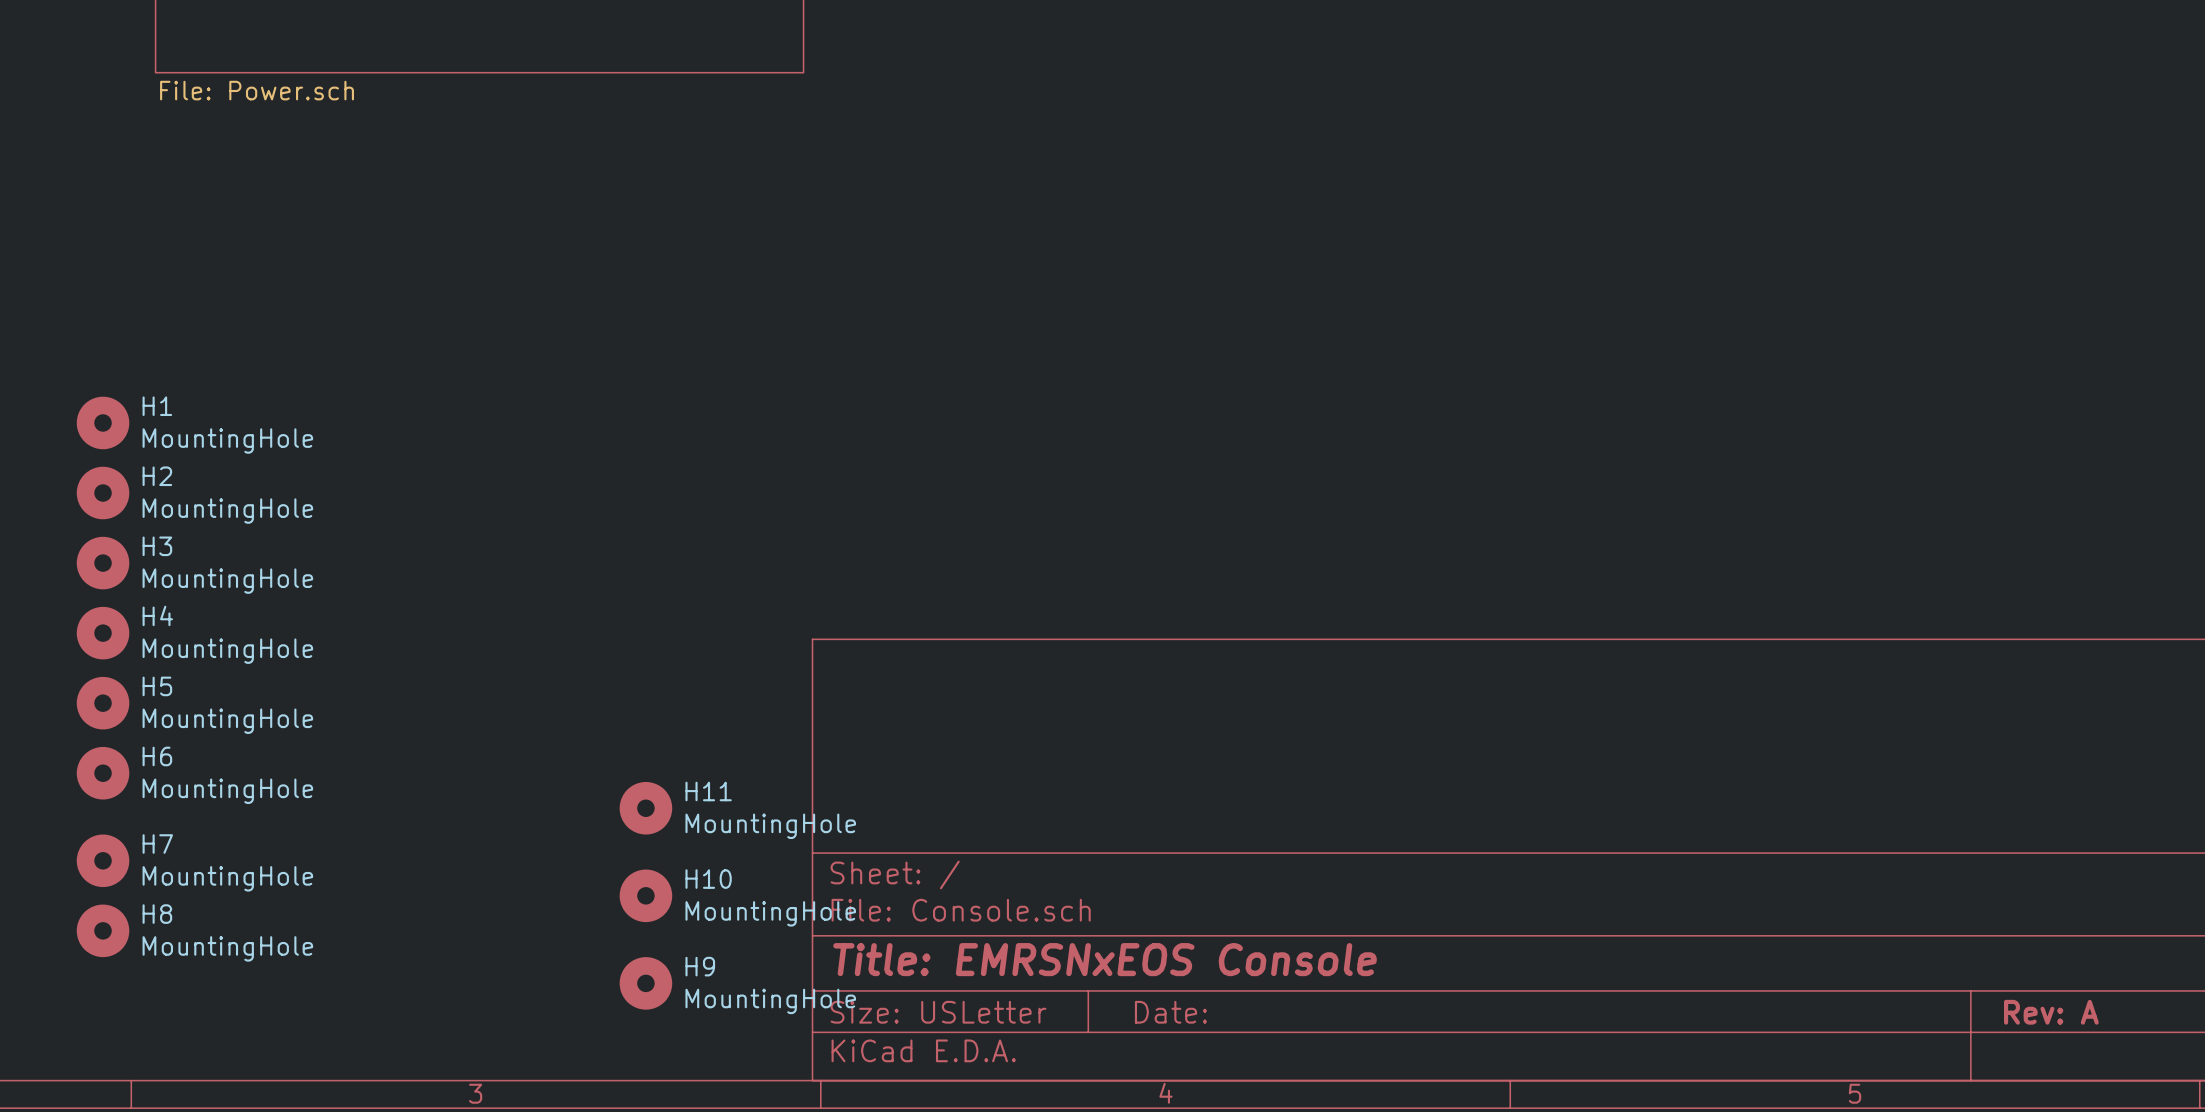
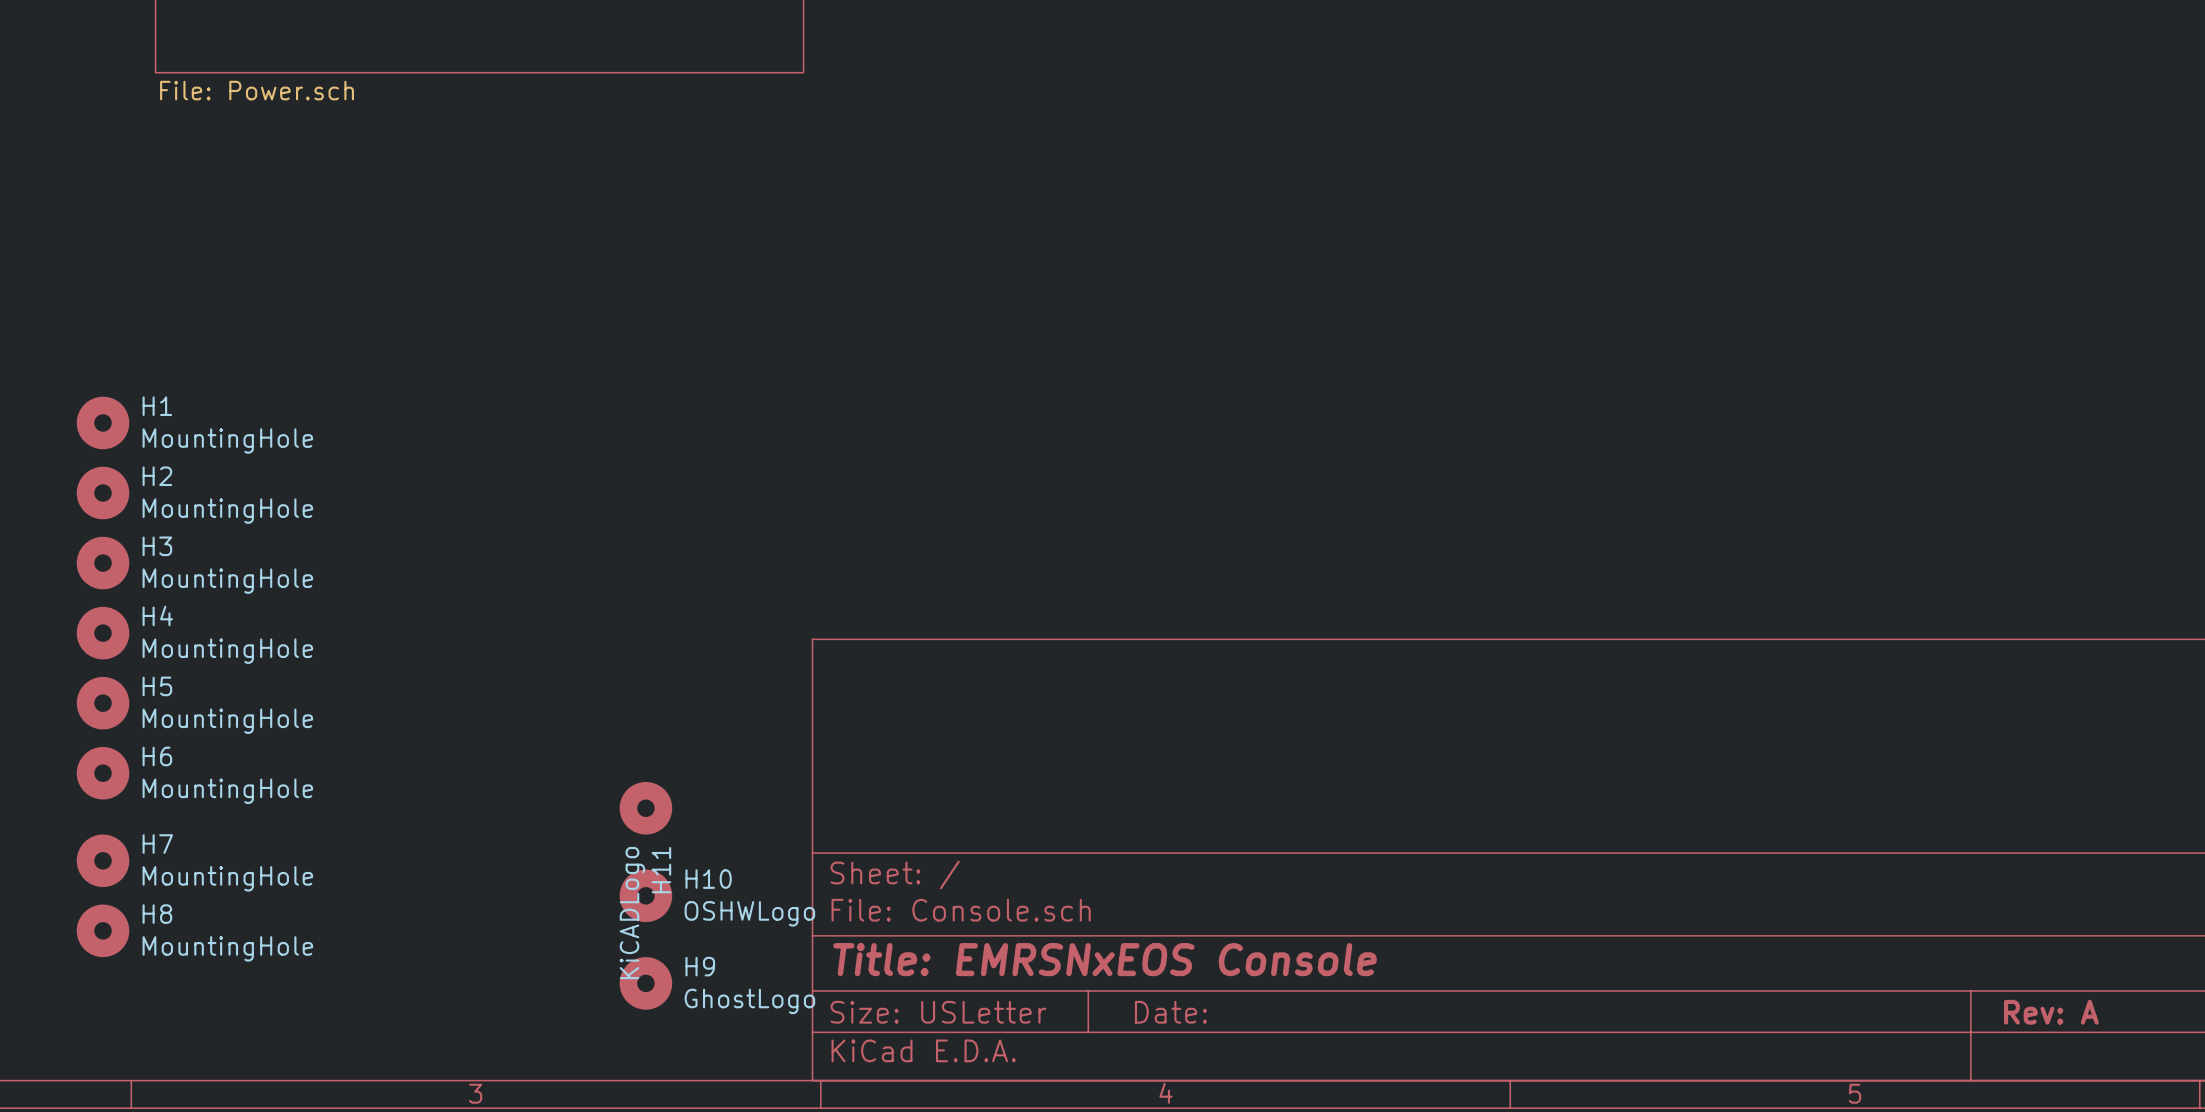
H11 name rotation: 0° (708, 791) -> 90° counterclockwise (661, 870)
H11 name position: H11 (708, 791) -> H11 (661, 870)
H11 value: MountingHole (770, 826) -> KiCADLogo (632, 913)
H10 value: MountingHole (770, 913) -> OSHWLogo (749, 913)
H9 value: MountingHole (770, 1001) -> GhostLogo (749, 1001)

